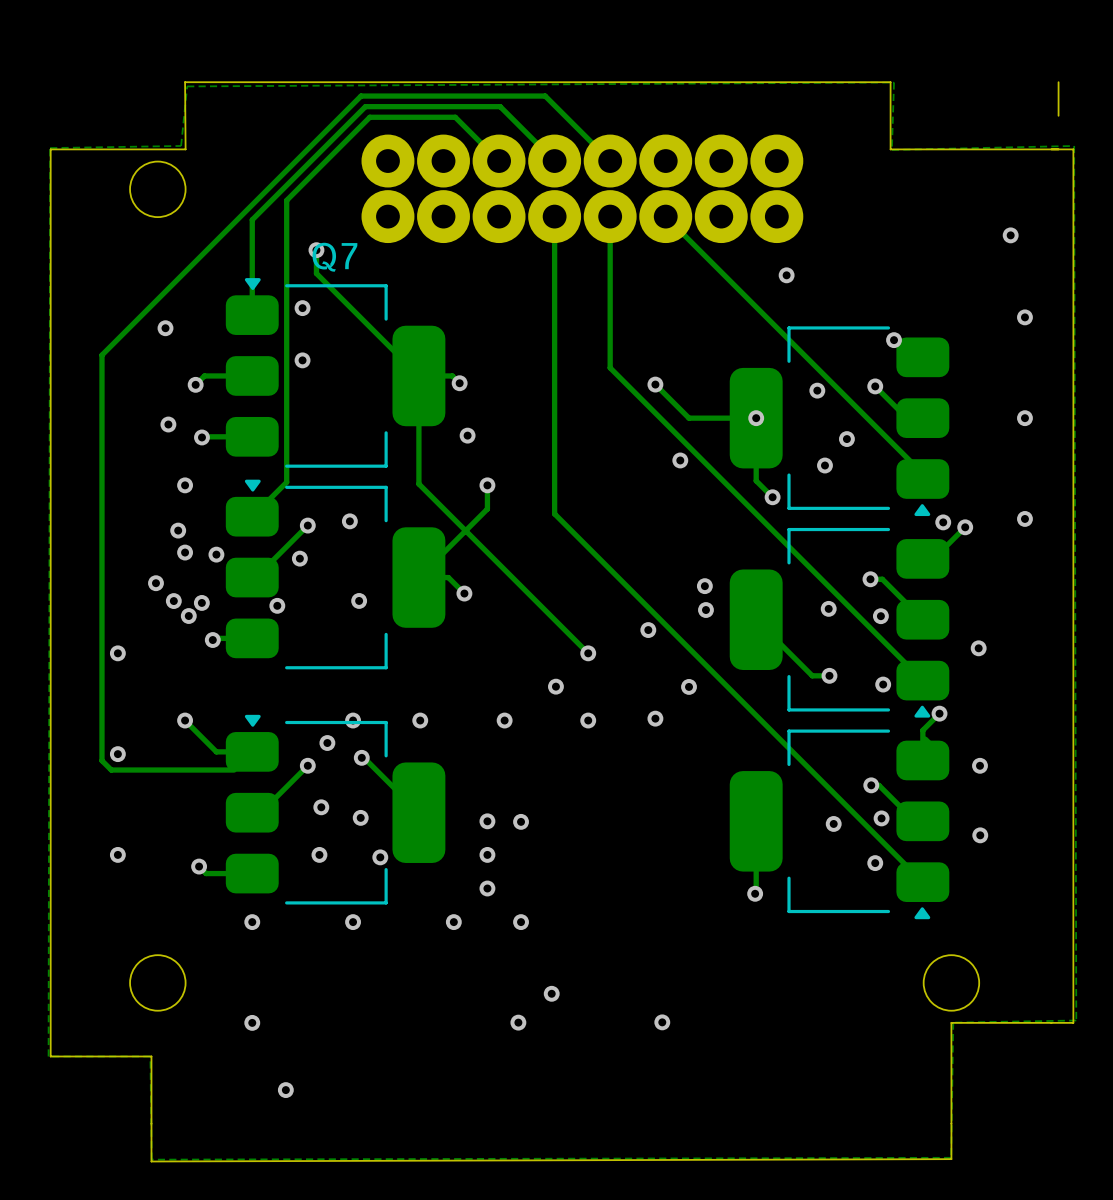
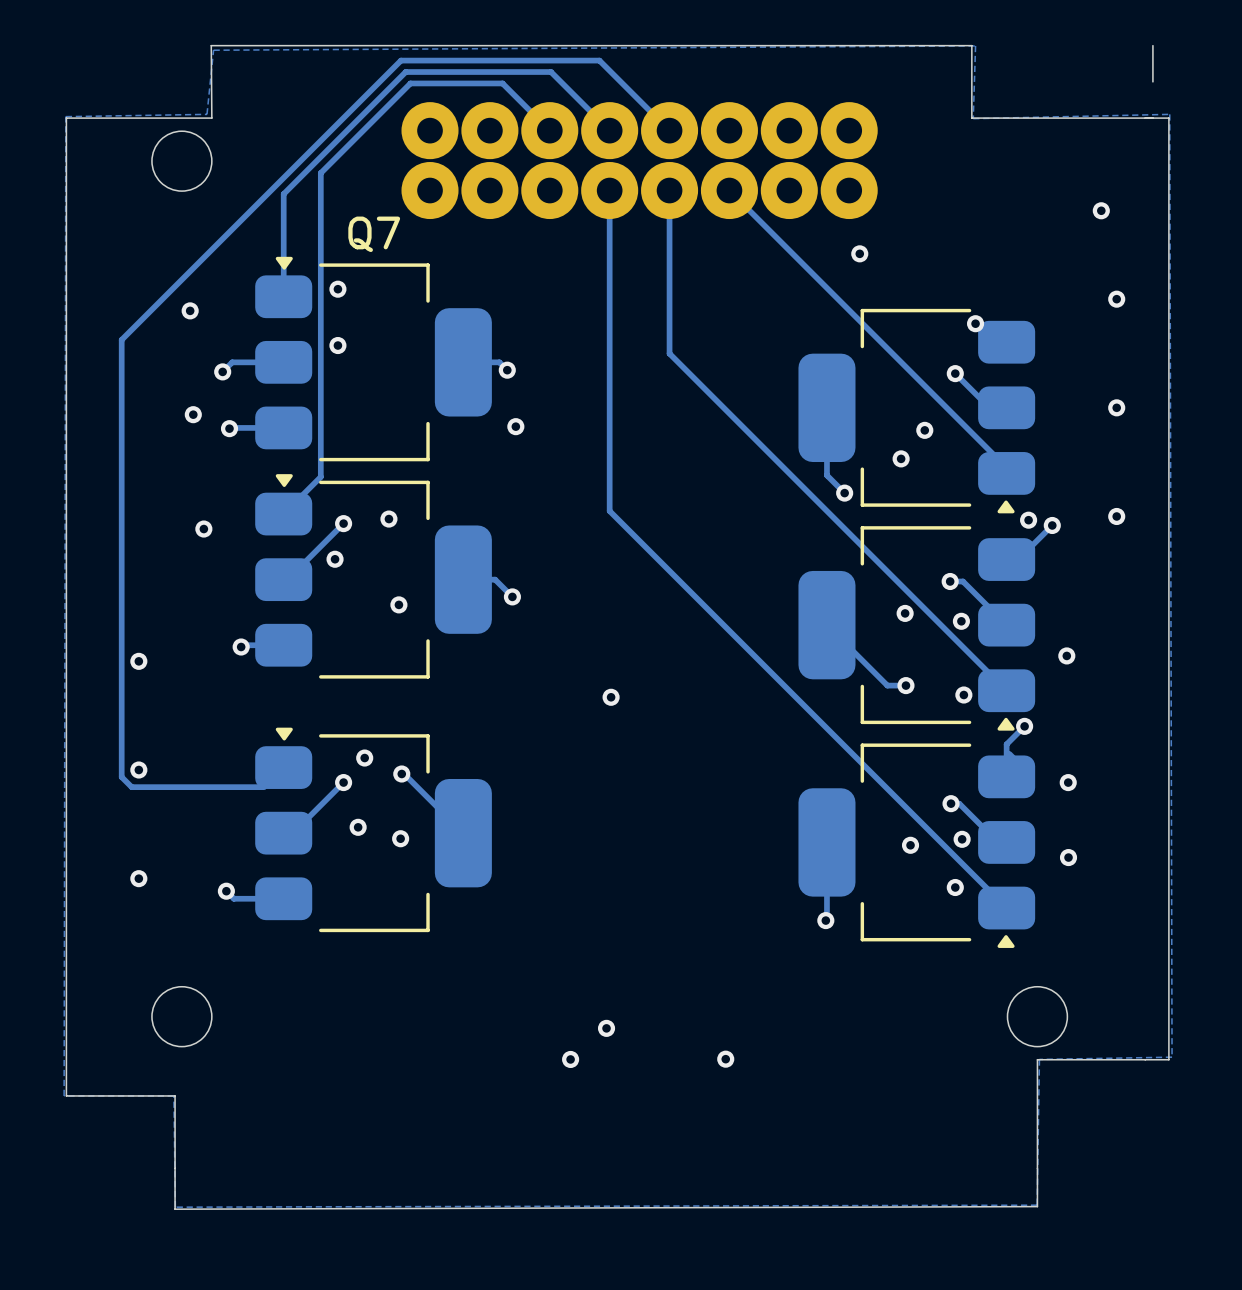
track: (316, 250) (316, 273) (418, 375) (418, 484) (588, 653) -> none
via: (316, 250) -> none
track: (655, 384) (689, 418) (756, 418) -> none
via: (655, 384) -> none
via: (817, 390) -> none
via: (756, 418) -> none
via: (680, 460) -> none
via: (185, 485) -> none
track: (487, 485) (487, 509) (418, 577) -> none
via: (487, 485) -> none
via: (185, 552) -> none
via: (216, 554) -> none
via: (155, 583) -> none
via: (704, 586) -> none
via: (173, 601) -> none
via: (201, 602) -> none
via: (277, 605) -> none
via: (705, 610) -> none
via: (188, 616) -> none
via: (648, 630) -> none
via: (588, 653) -> none
via: (689, 686) -> none
via: (655, 718) -> none
track: (185, 720) (216, 751) (252, 751) -> none
via: (185, 720) -> none
via: (353, 720) -> none
via: (420, 720) -> none
via: (504, 720) -> none
via: (588, 720) -> none
via: (487, 821) -> none
via: (521, 821) -> none
via: (319, 854) -> none
via: (487, 854) -> none
via: (380, 857) -> none
via: (487, 888) -> none
via: (252, 922) -> none
via: (353, 922) -> none
via: (453, 922) -> none
via: (521, 922) -> none
via: (252, 1022) -> none
via: (285, 1090) -> none

